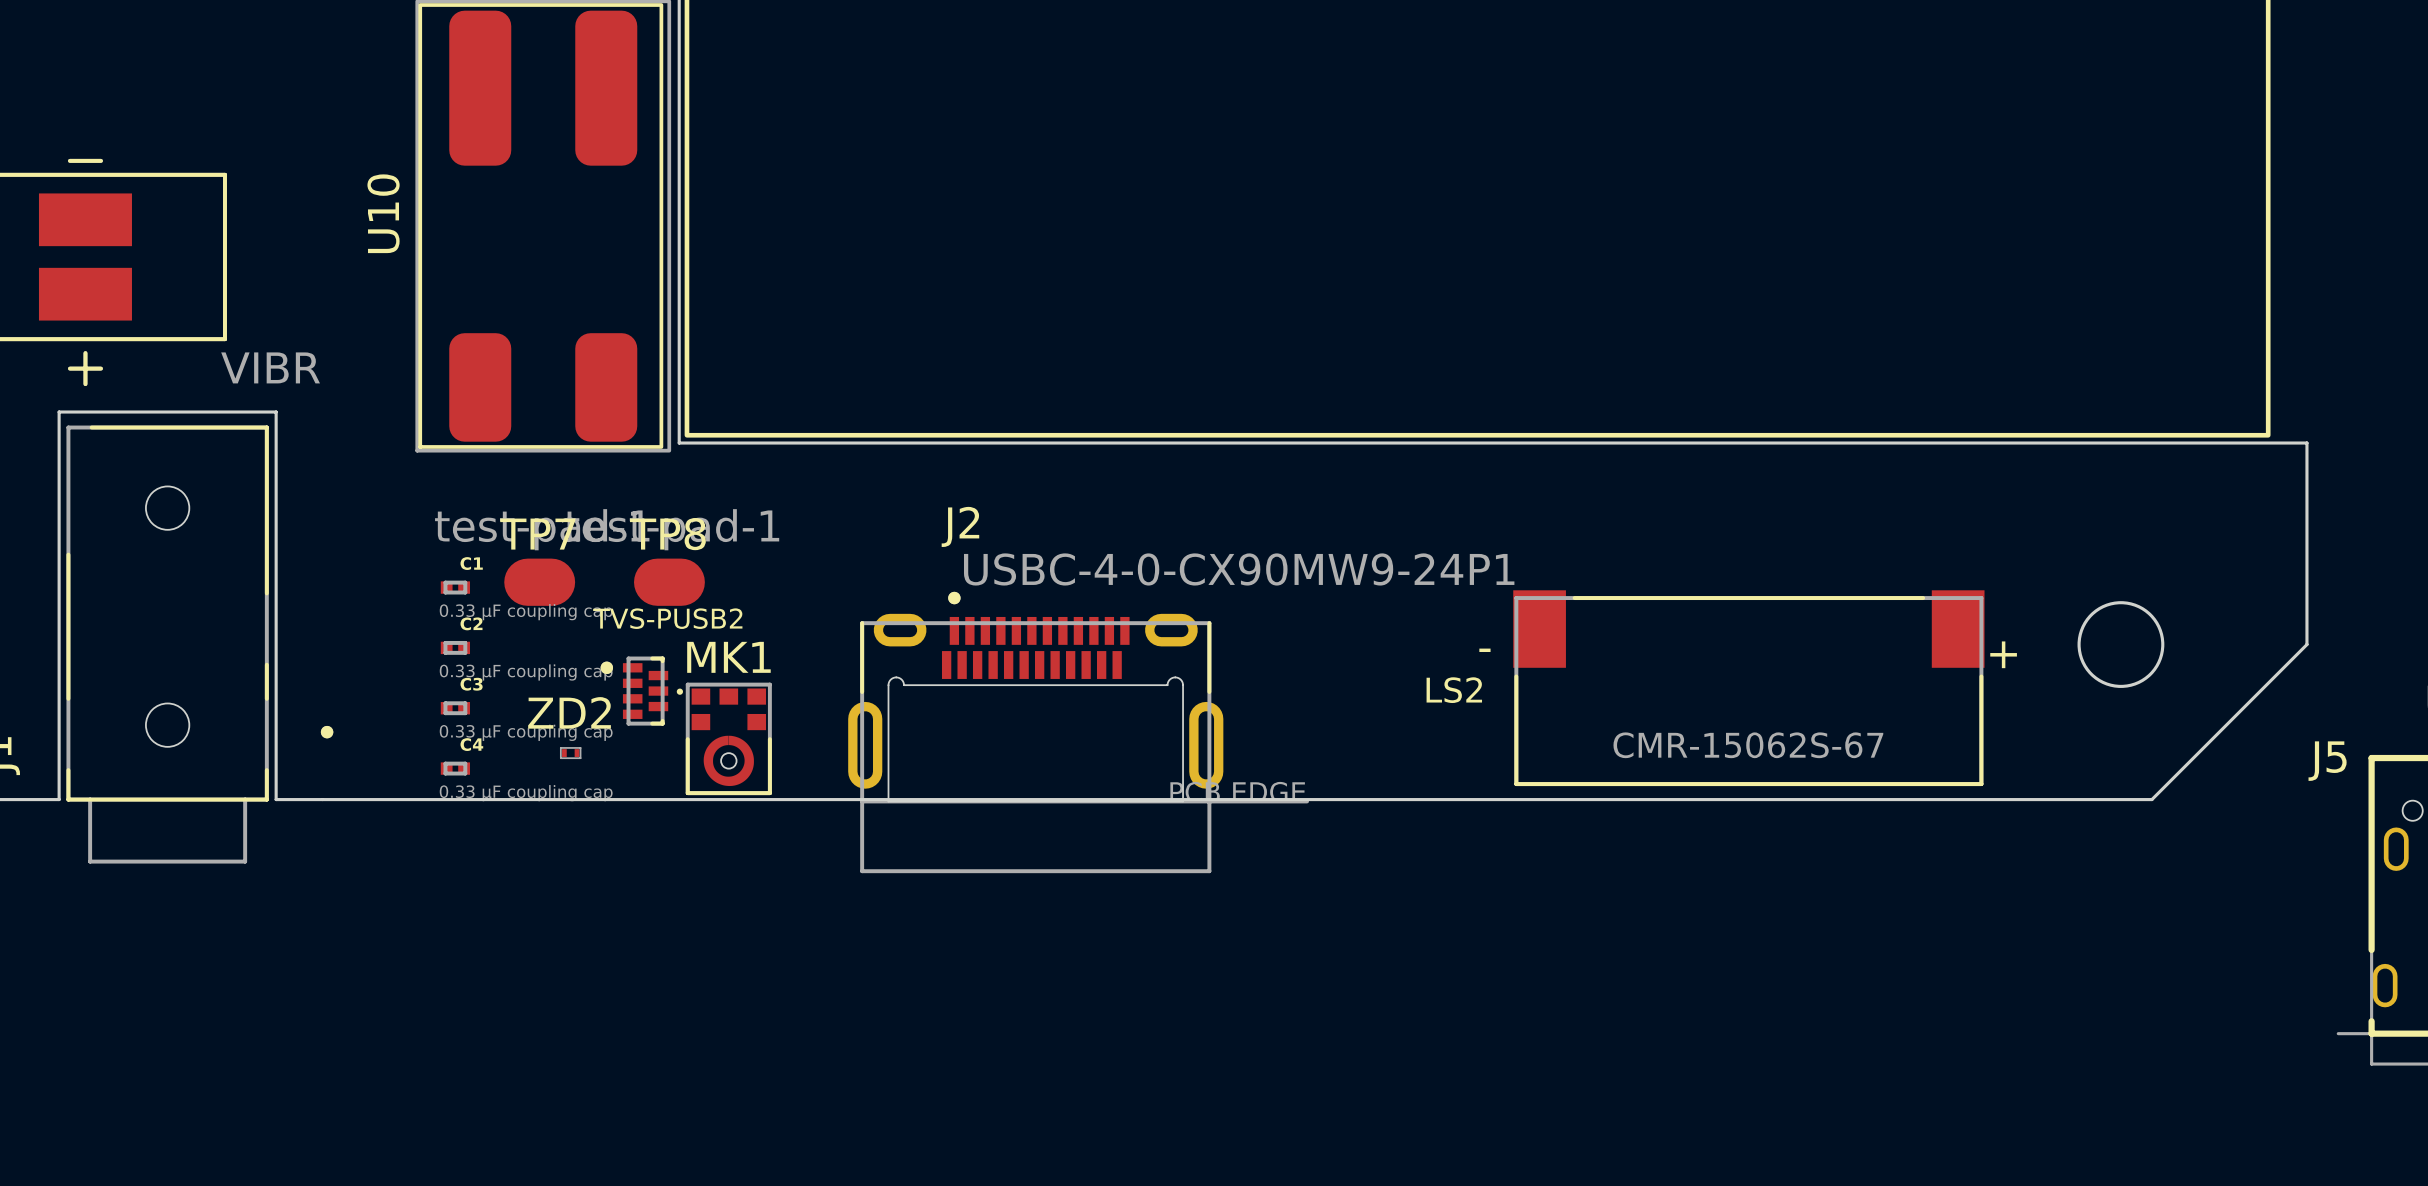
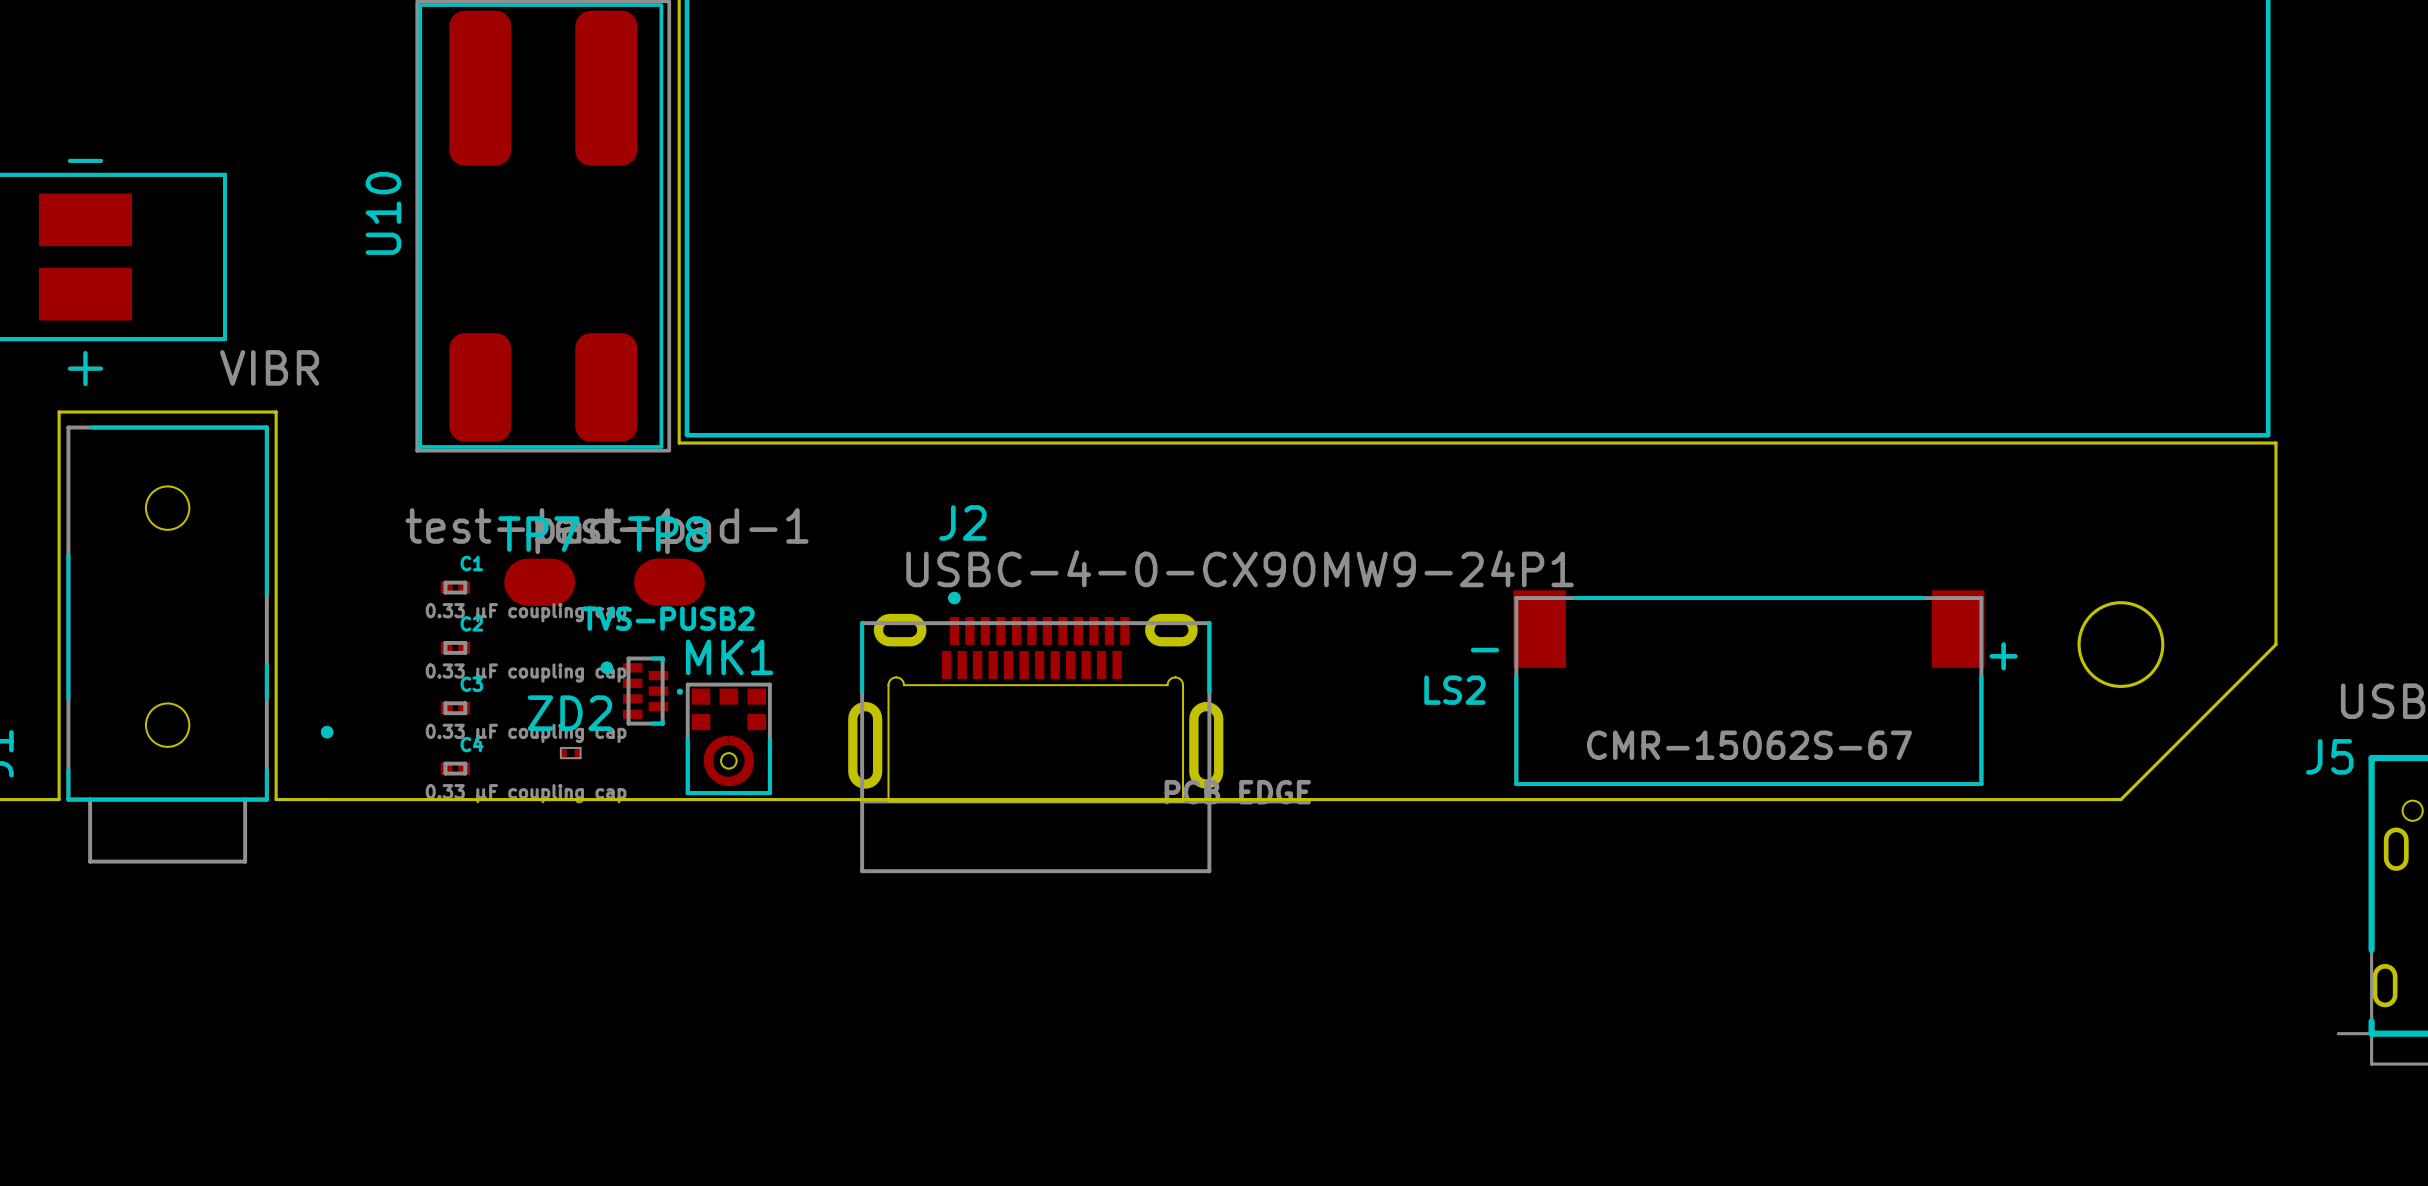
board edge: (2275, 443) (2306, 443) (2306, 644) (2151, 799) (2120, 799) -> (2275, 443) (2275, 644) (2120, 799)

